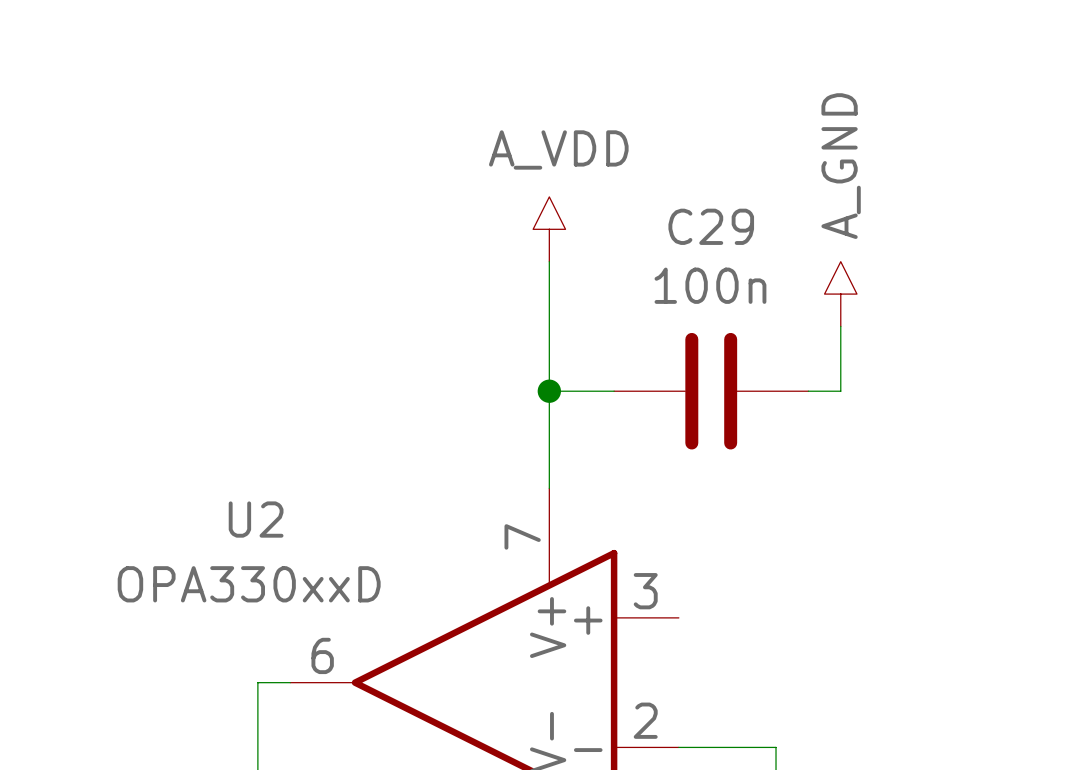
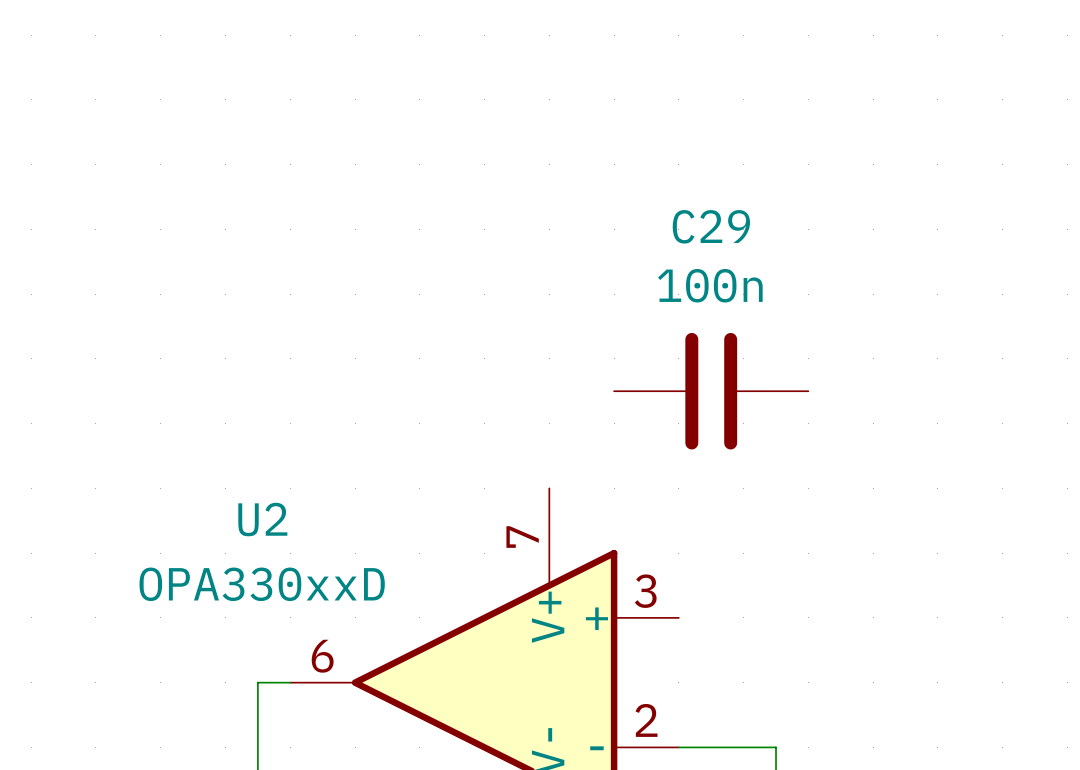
power symbol: A_VDD (549, 229) -> none
wire: (549, 261) (549, 488) -> none
power symbol: A_GND (840, 294) -> none
wire: (840, 326) (840, 391) (808, 391) -> none
wire: (549, 391) (614, 391) -> none
junction: (549, 391) -> none

